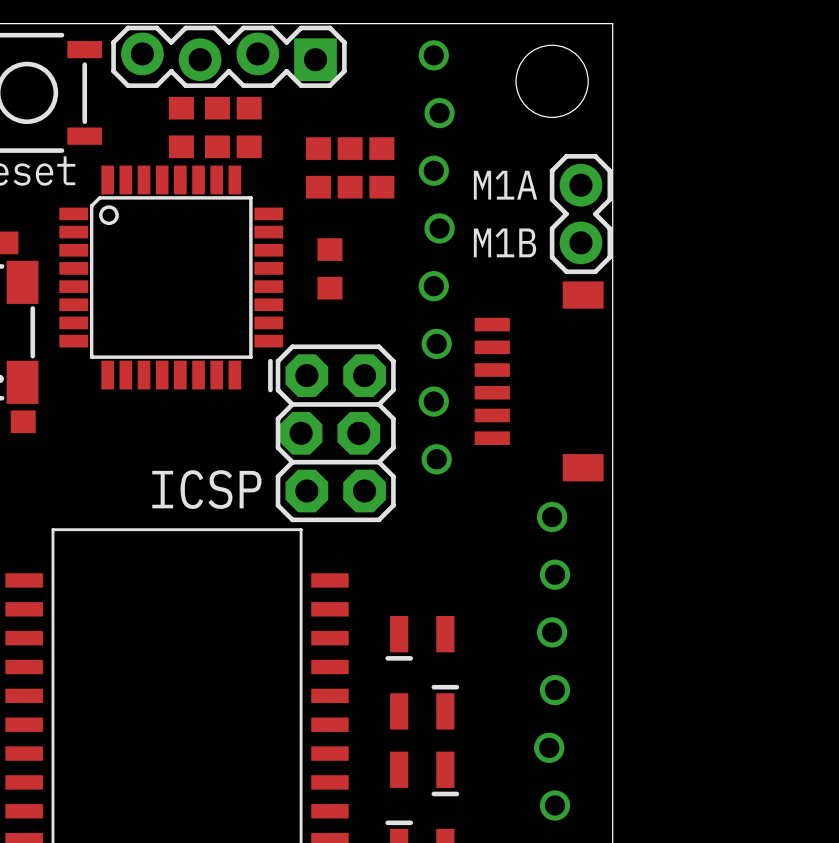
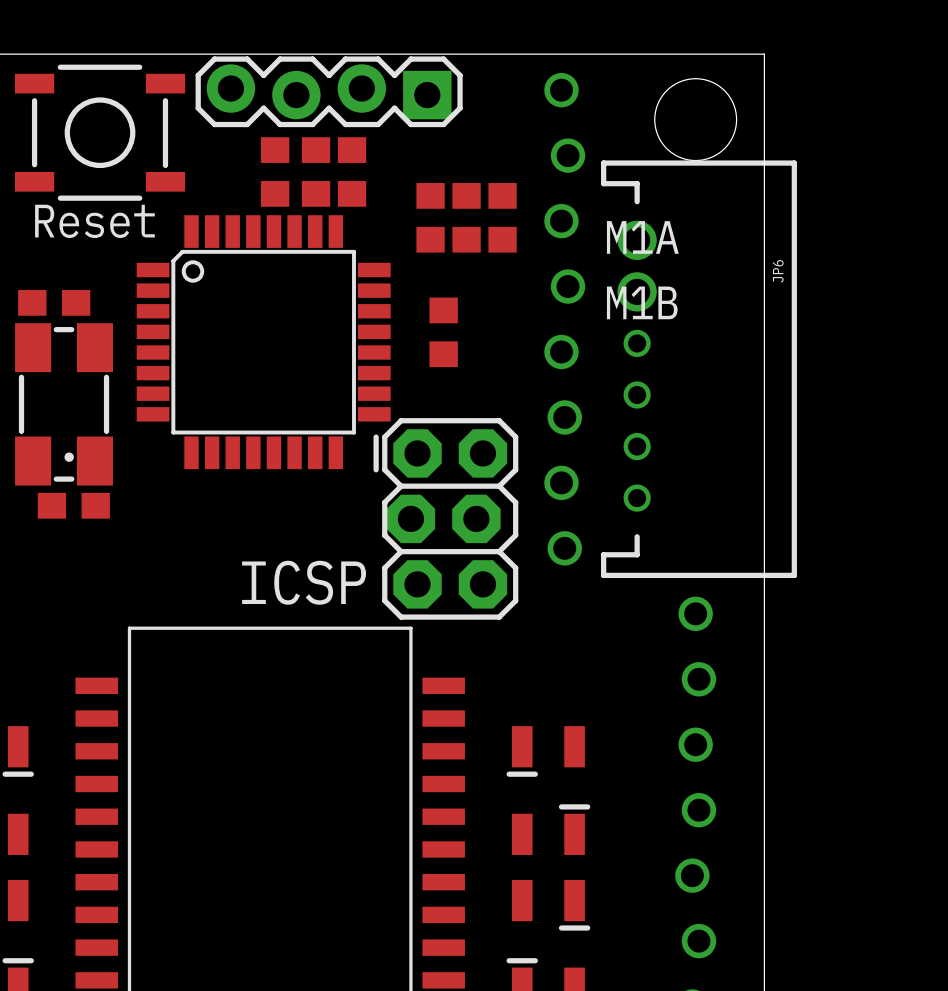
part: (580, 214) -> none
JP6: none -> (698, 369)
part: (539, 381) -> none

